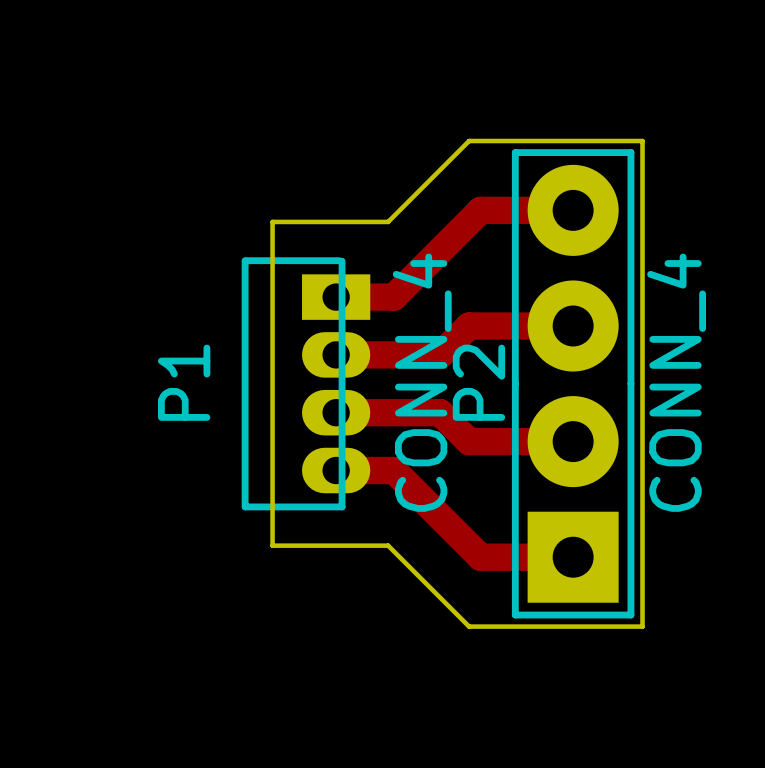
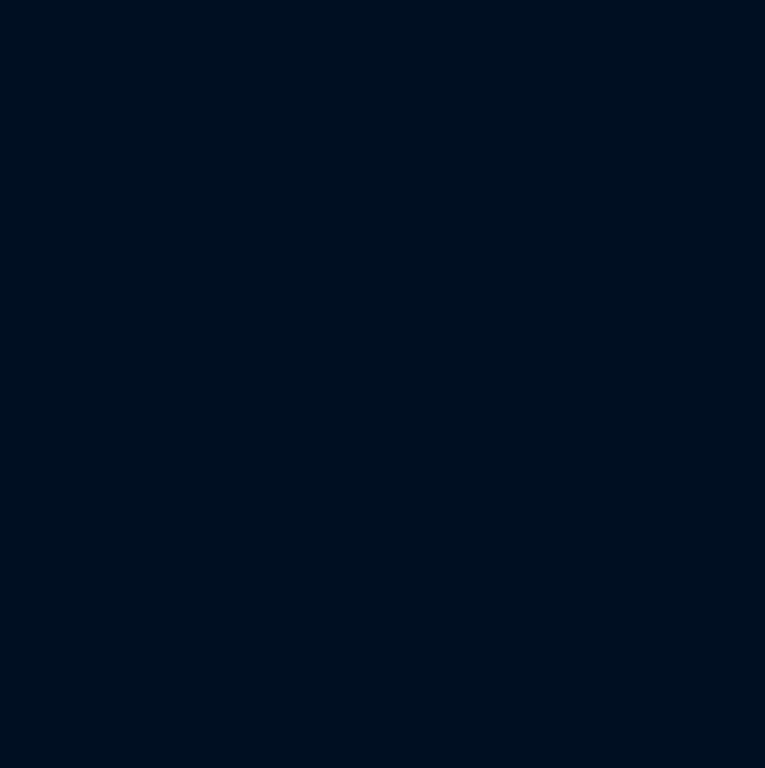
board edge: (469, 141) (388, 221) (272, 221) (272, 545) (388, 545) (469, 626) (642, 626) (642, 141) (469, 141) -> none
top track: (573, 210) (480, 210) (393, 297) (336, 297) -> none
top track: (573, 325) (469, 325) (440, 354) (336, 354) -> none
P1: CONN_4 (305, 383) -> none
P2: CONN_4 (573, 383) -> none
top track: (336, 412) (440, 412) (469, 441) (573, 441) -> none
top track: (336, 470) (393, 470) (480, 557) (573, 557) -> none

